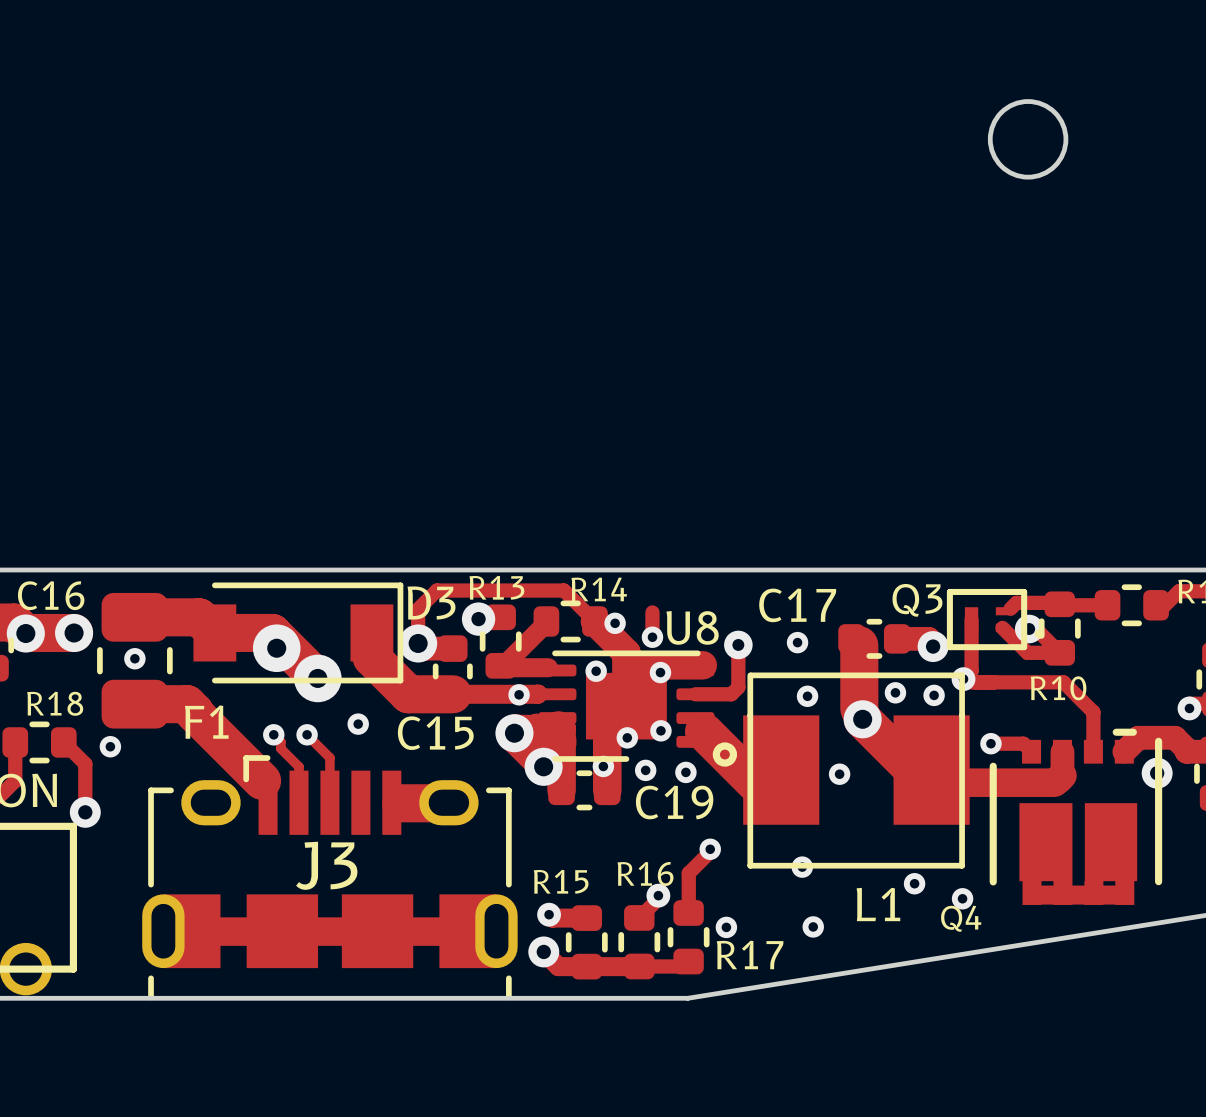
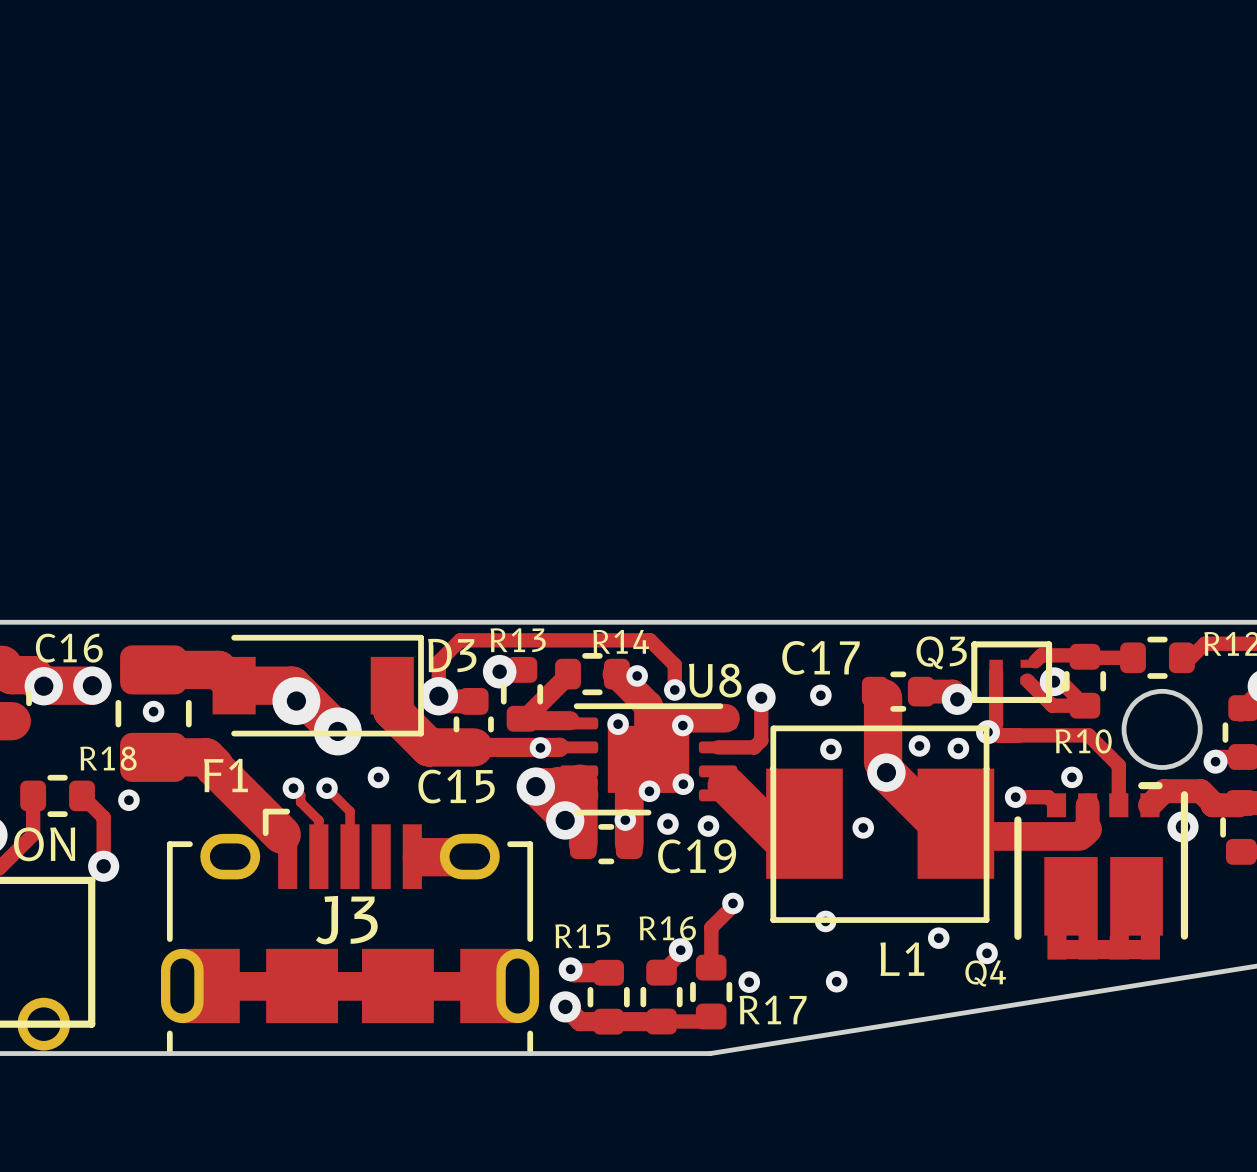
round board edge position: (1028, 139) -> (1162, 729)
track: (436, 590) (564, 590) (594, 621) -> (457, 642) (460, 640) (650, 640) (674, 665)
R18 name position: R18 (55, 703) -> R18 (108, 758)
via: none -> (1071, 777)
drawing: [712, 742, 738, 767] -> none

